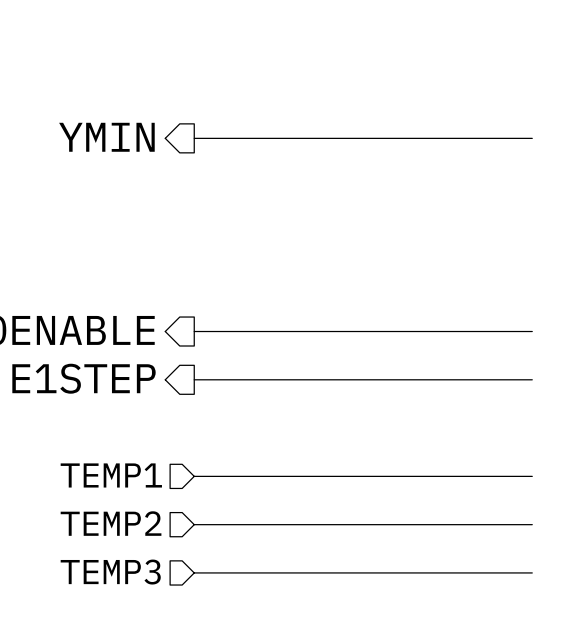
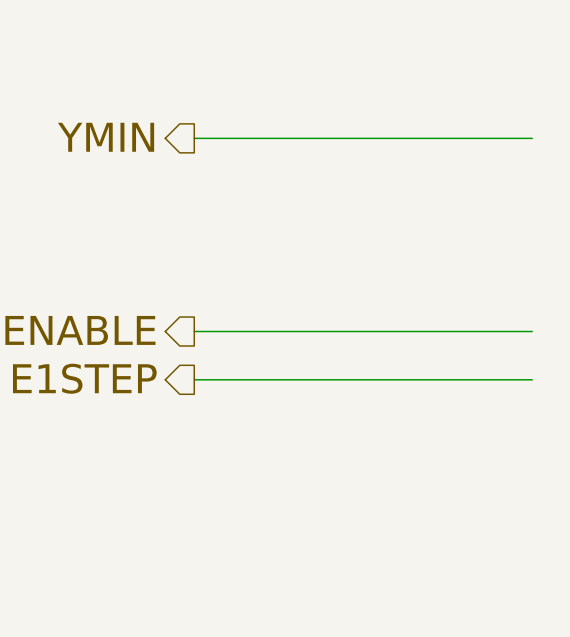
hierarchical label: TEMP1 (111, 475) -> none
wire: (194, 476) (532, 476) -> none
hierarchical label: TEMP2 (111, 523) -> none
wire: (194, 524) (532, 524) -> none
hierarchical label: TEMP3 (110, 572) -> none
wire: (194, 572) (532, 572) -> none

